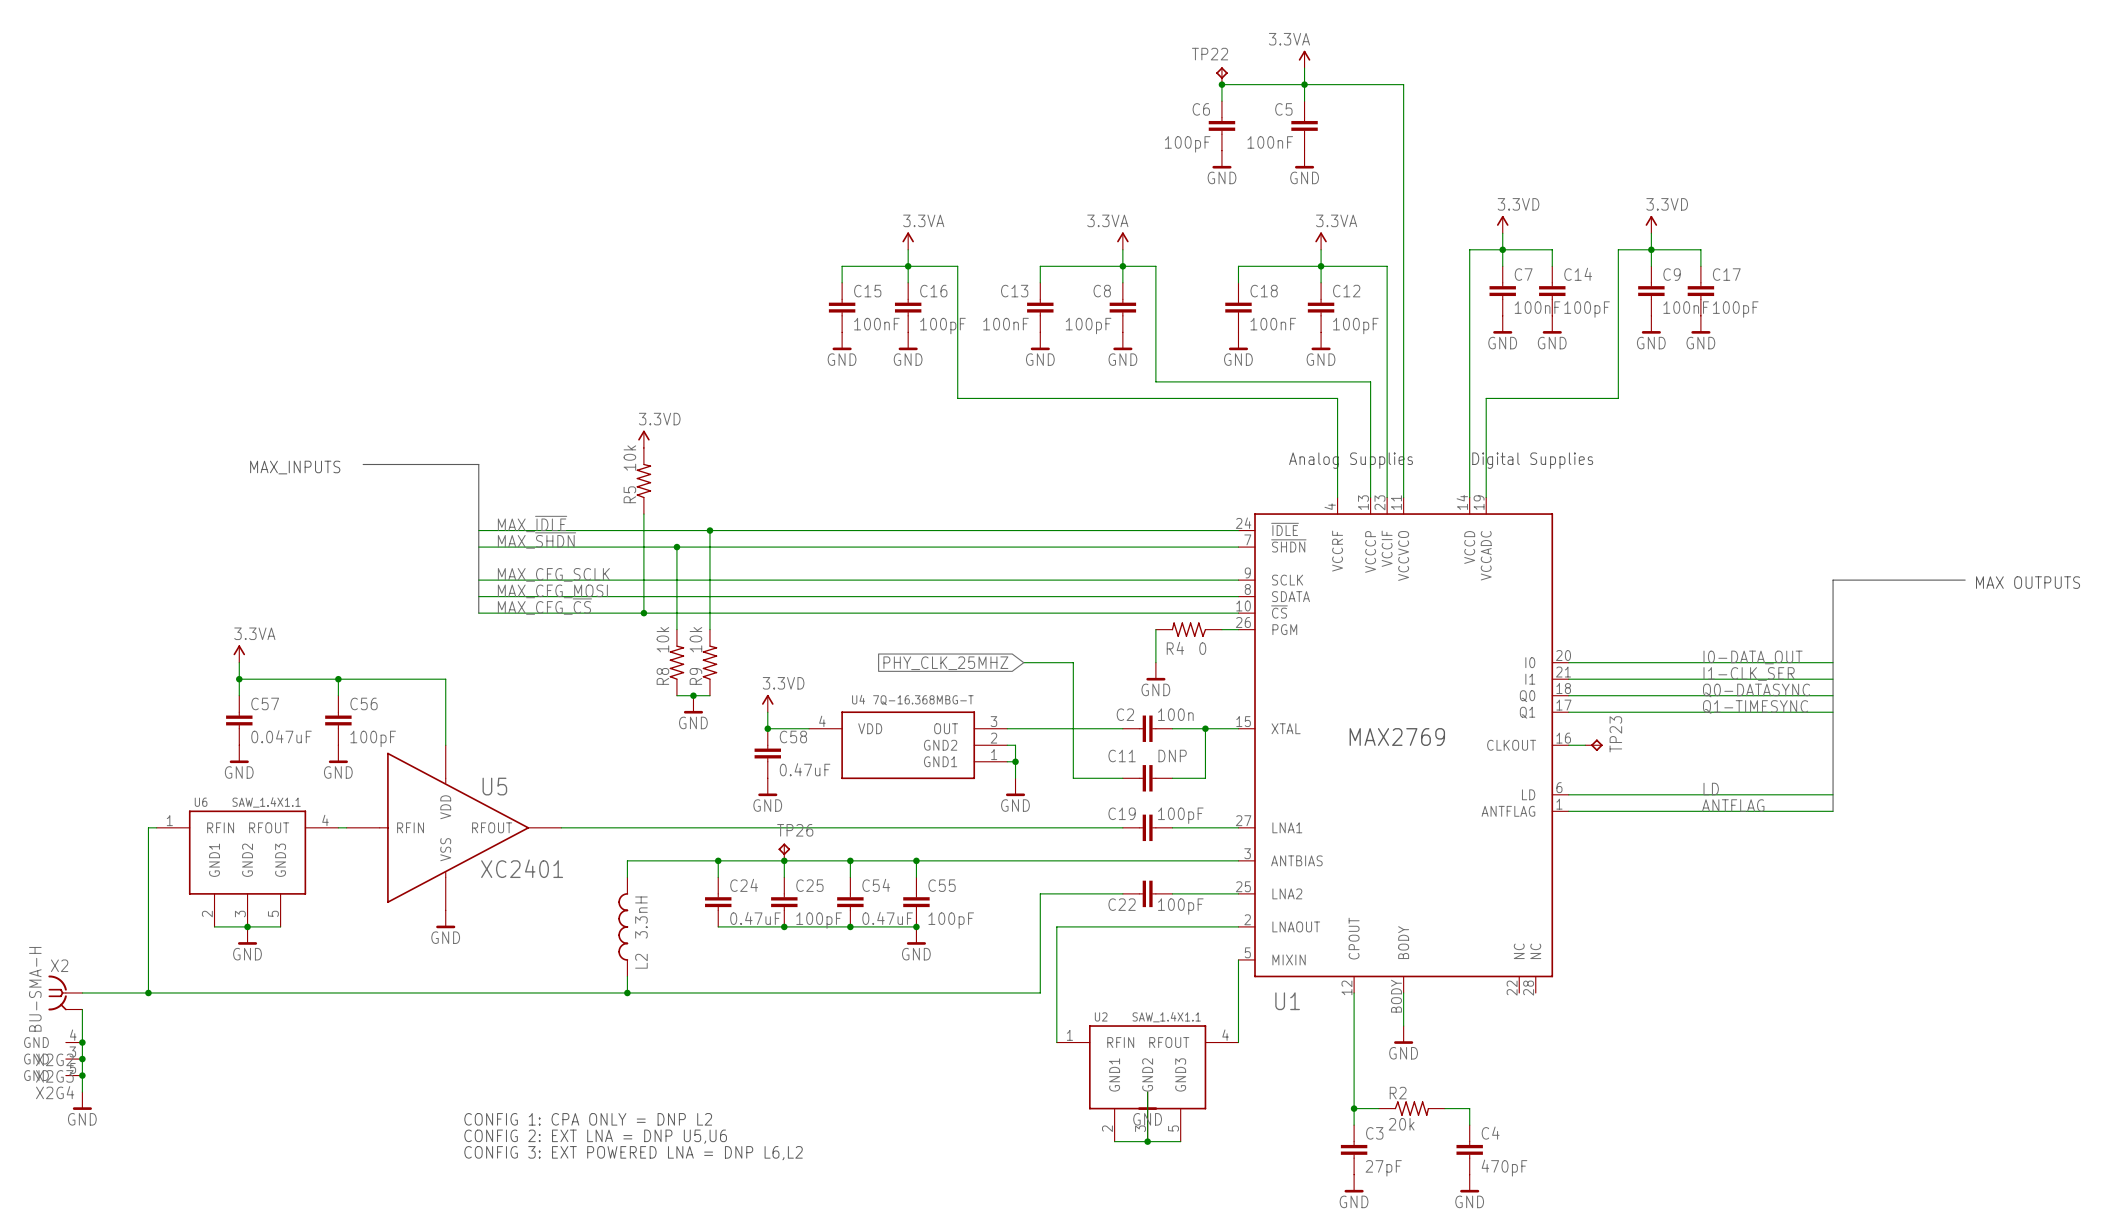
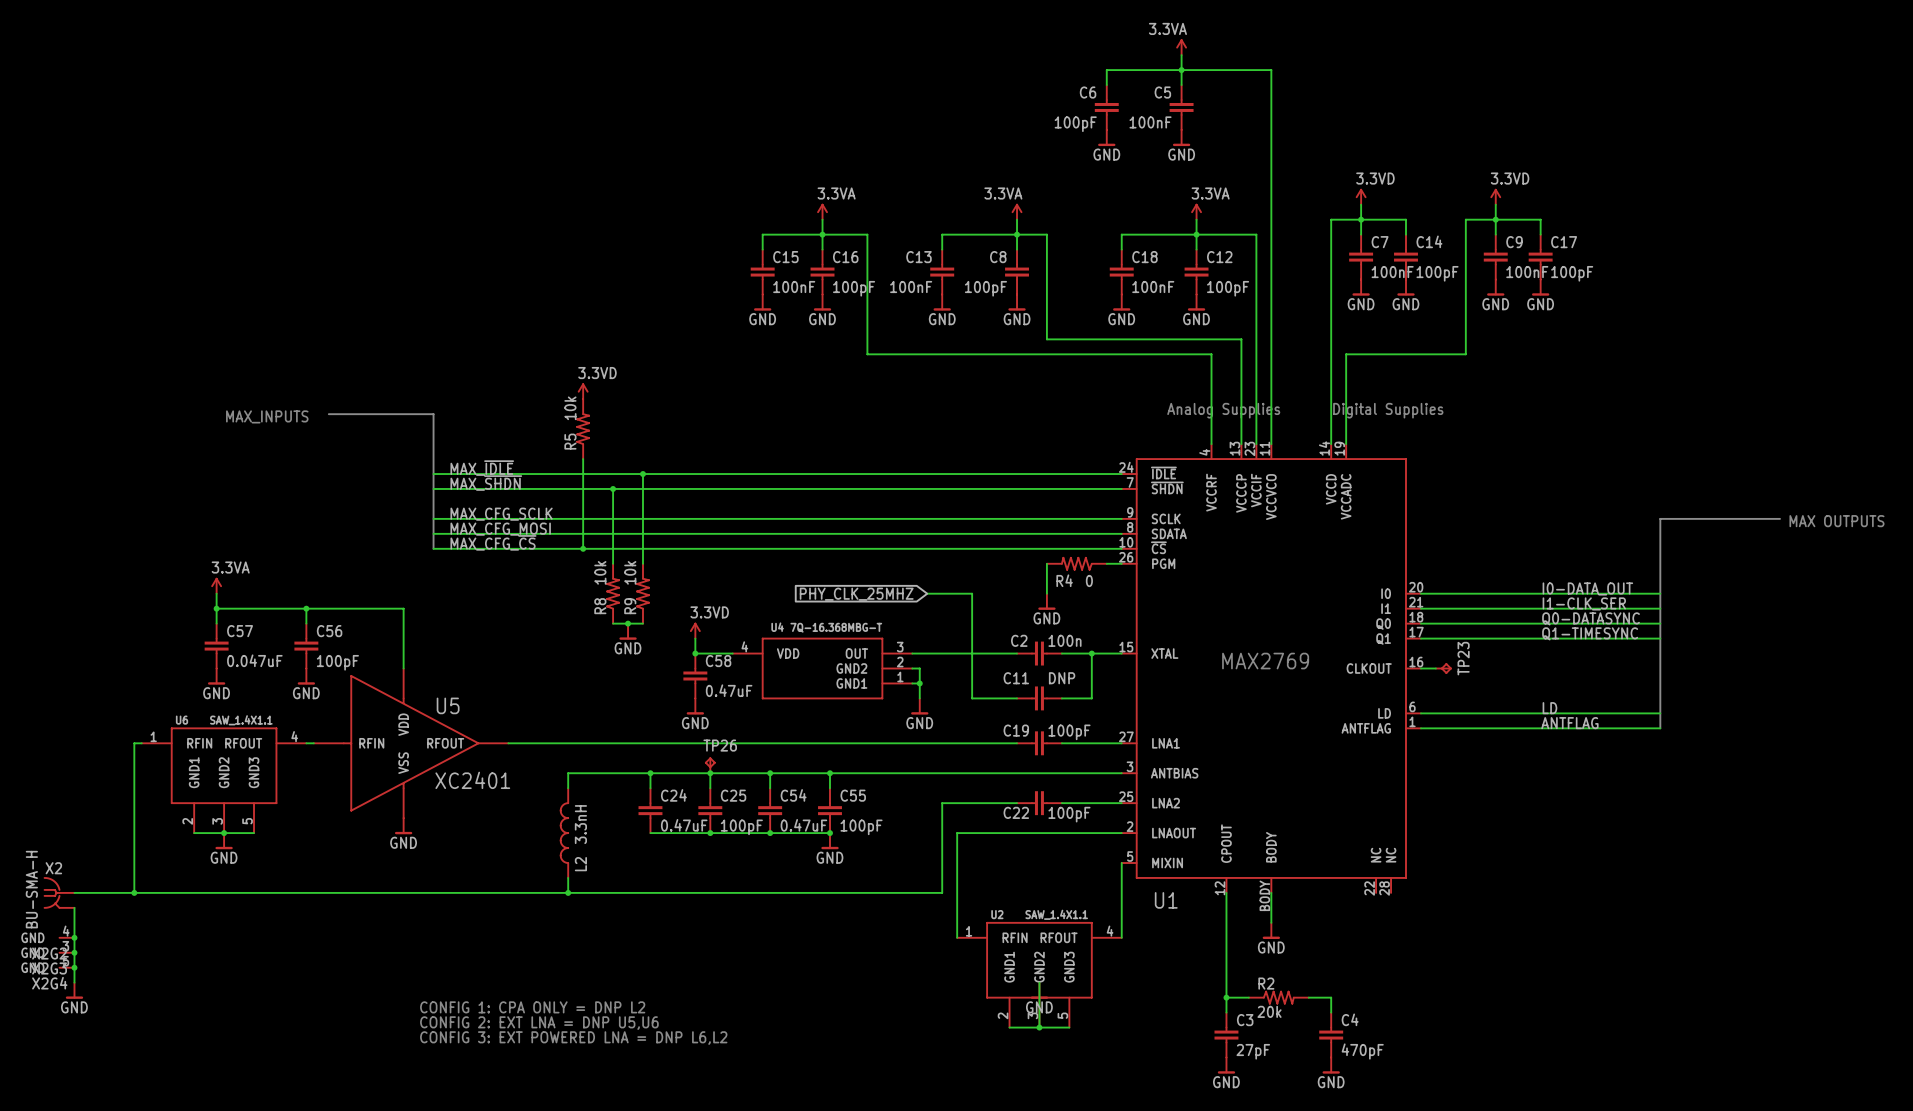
TP22: (1221, 75) -> none
junction: (1221, 84) -> none

